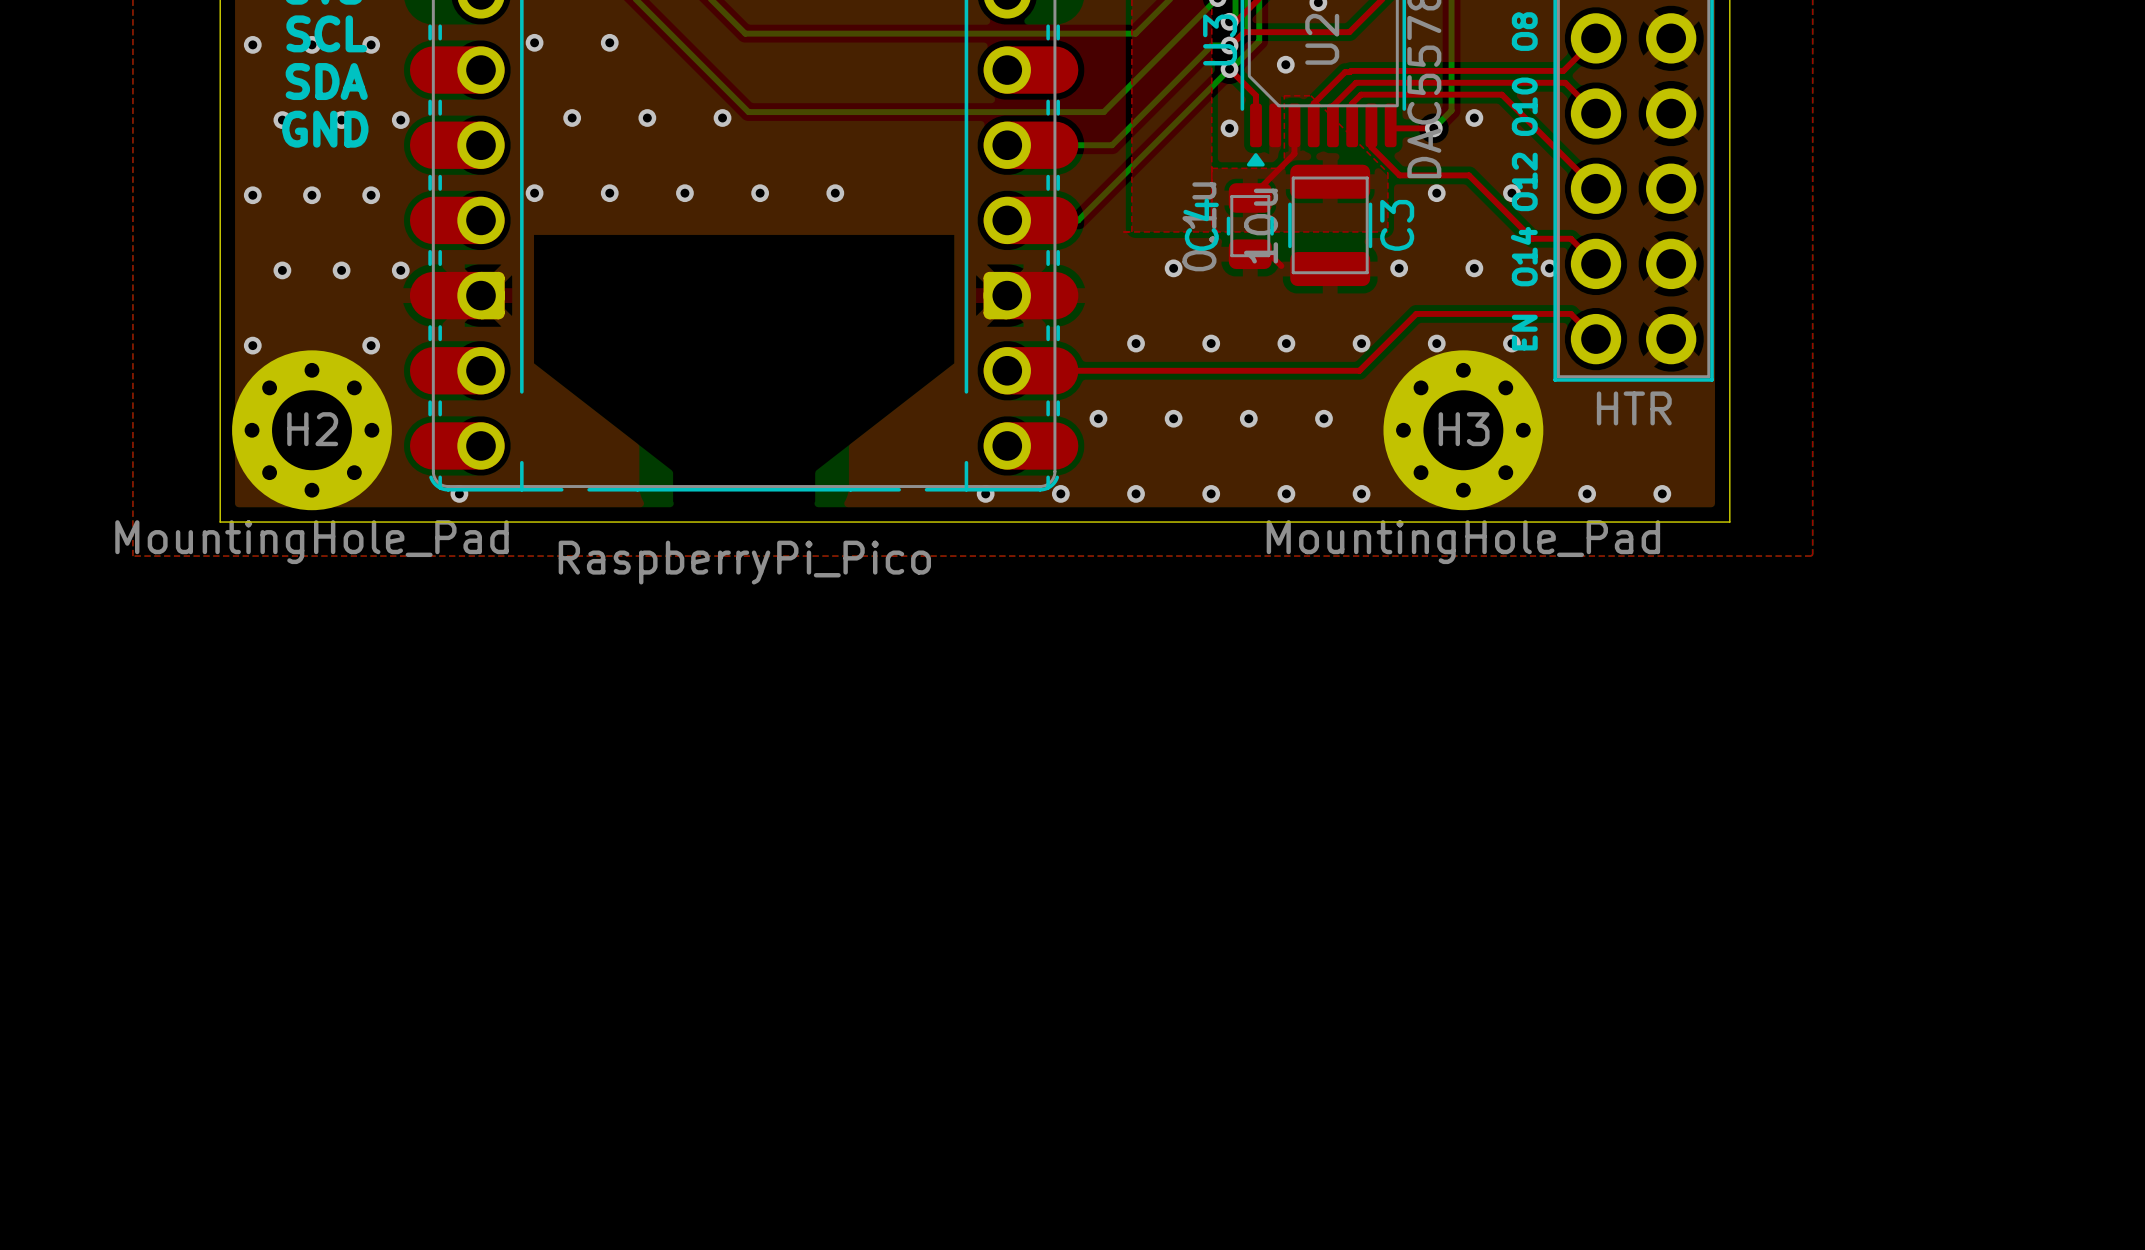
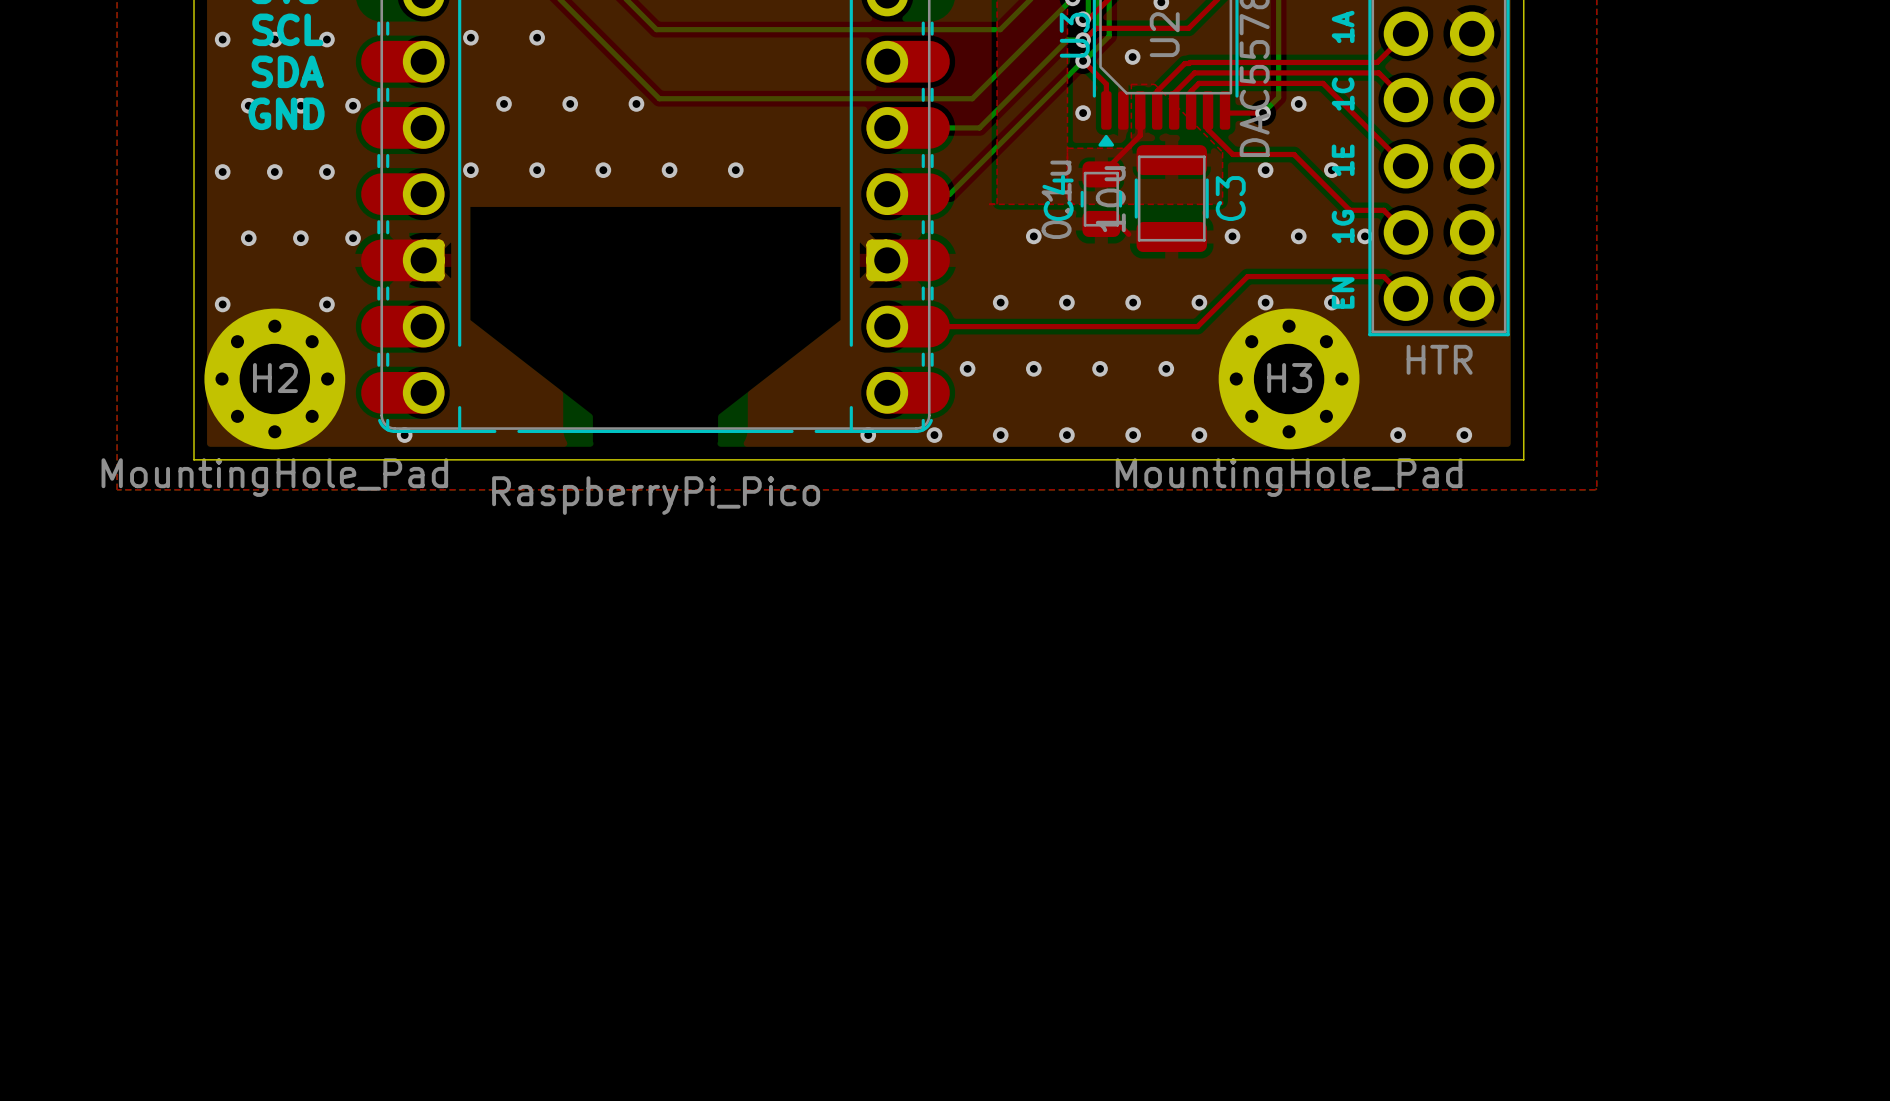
text: O8 (1524, 31) -> 1A (1343, 26)
text: O10 (1524, 106) -> 1C (1343, 94)
text: O12 (1524, 181) -> 1E (1343, 160)
text: O14 (1524, 256) -> 1G (1343, 226)

